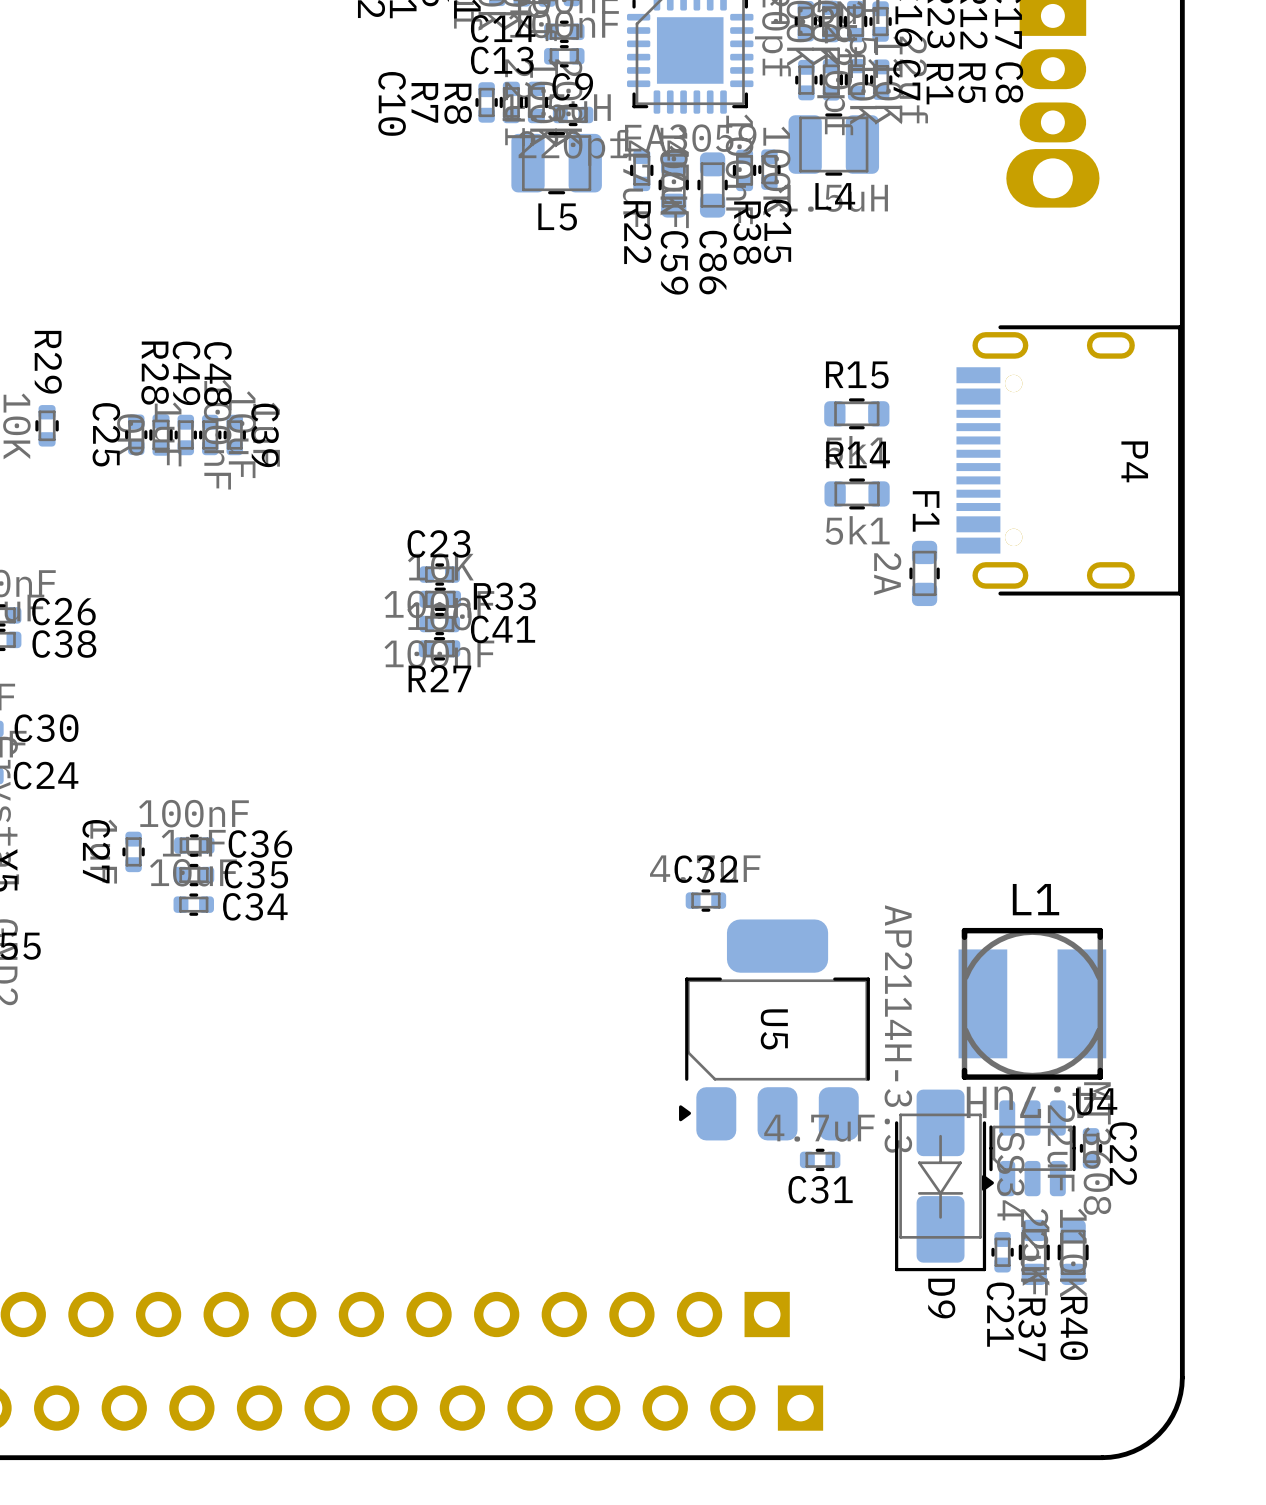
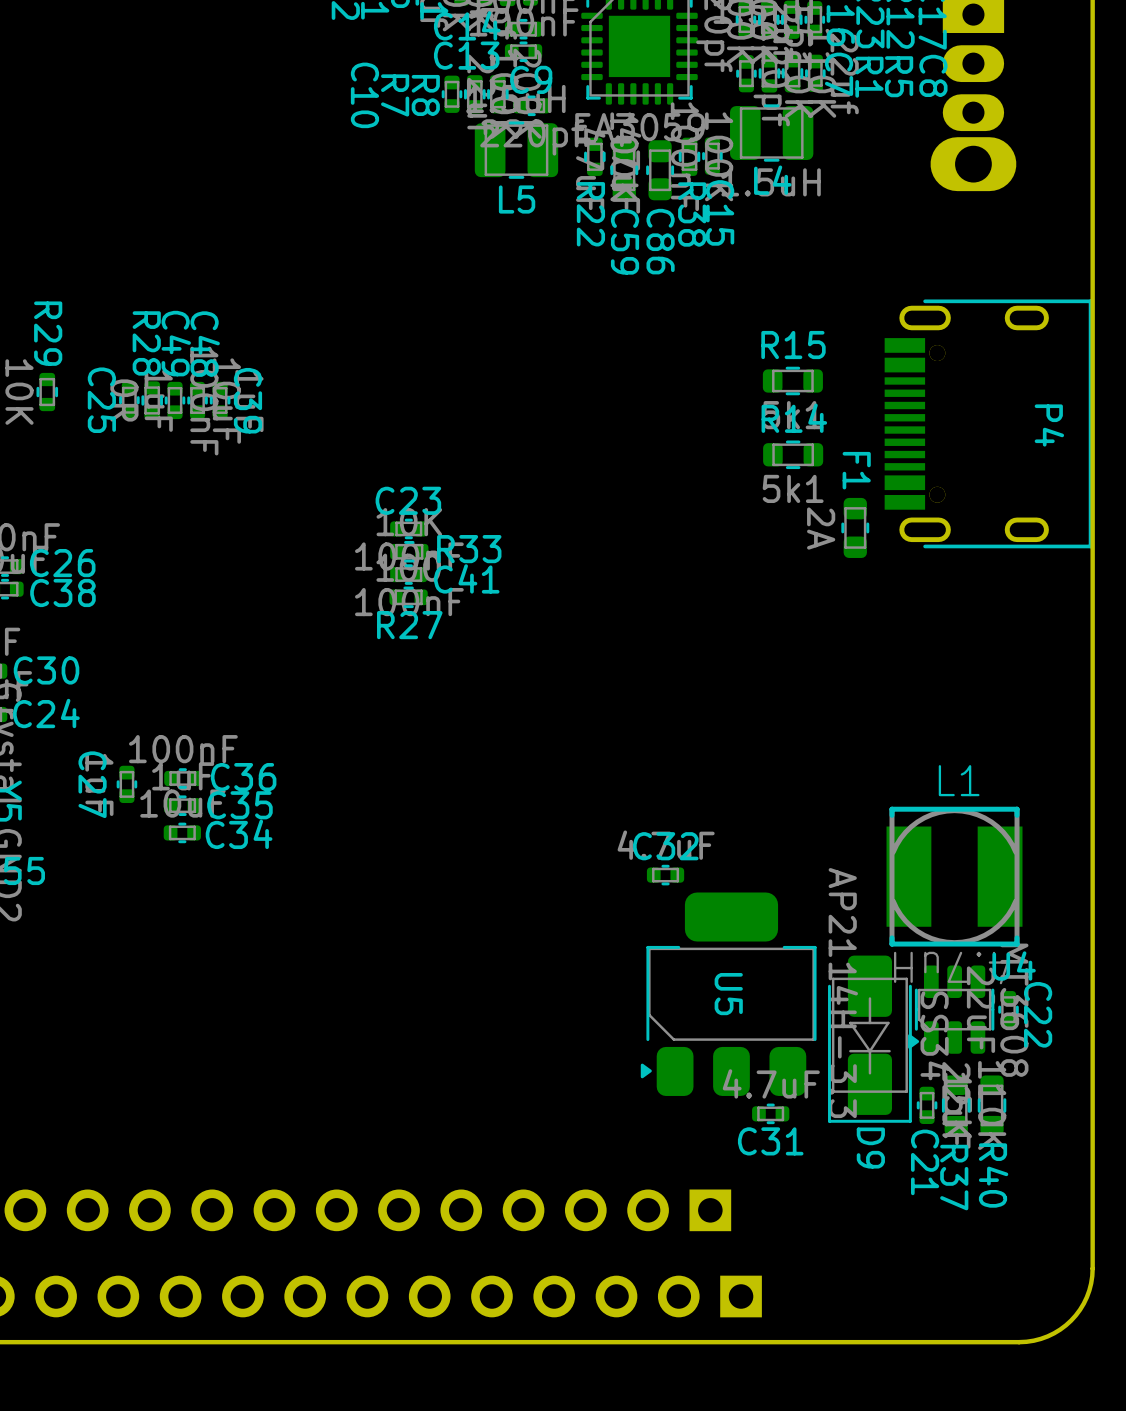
C32 position: (705, 900) -> (665, 875)
L1 position: (1032, 1003) -> (954, 876)
U5 position: (774, 1029) -> (728, 994)
D9 footprint: [895, 1089, 987, 1272] -> [828, 955, 912, 1123]
U4 position: (1028, 1148) -> (951, 1009)
C22 position: (1091, 1148) -> (1008, 1009)
C31 position: (820, 1159) -> (770, 1113)
C21 position: (1002, 1252) -> (927, 1105)
R37 position: (1034, 1252) -> (956, 1105)
R40 position: (1073, 1252) -> (992, 1105)

